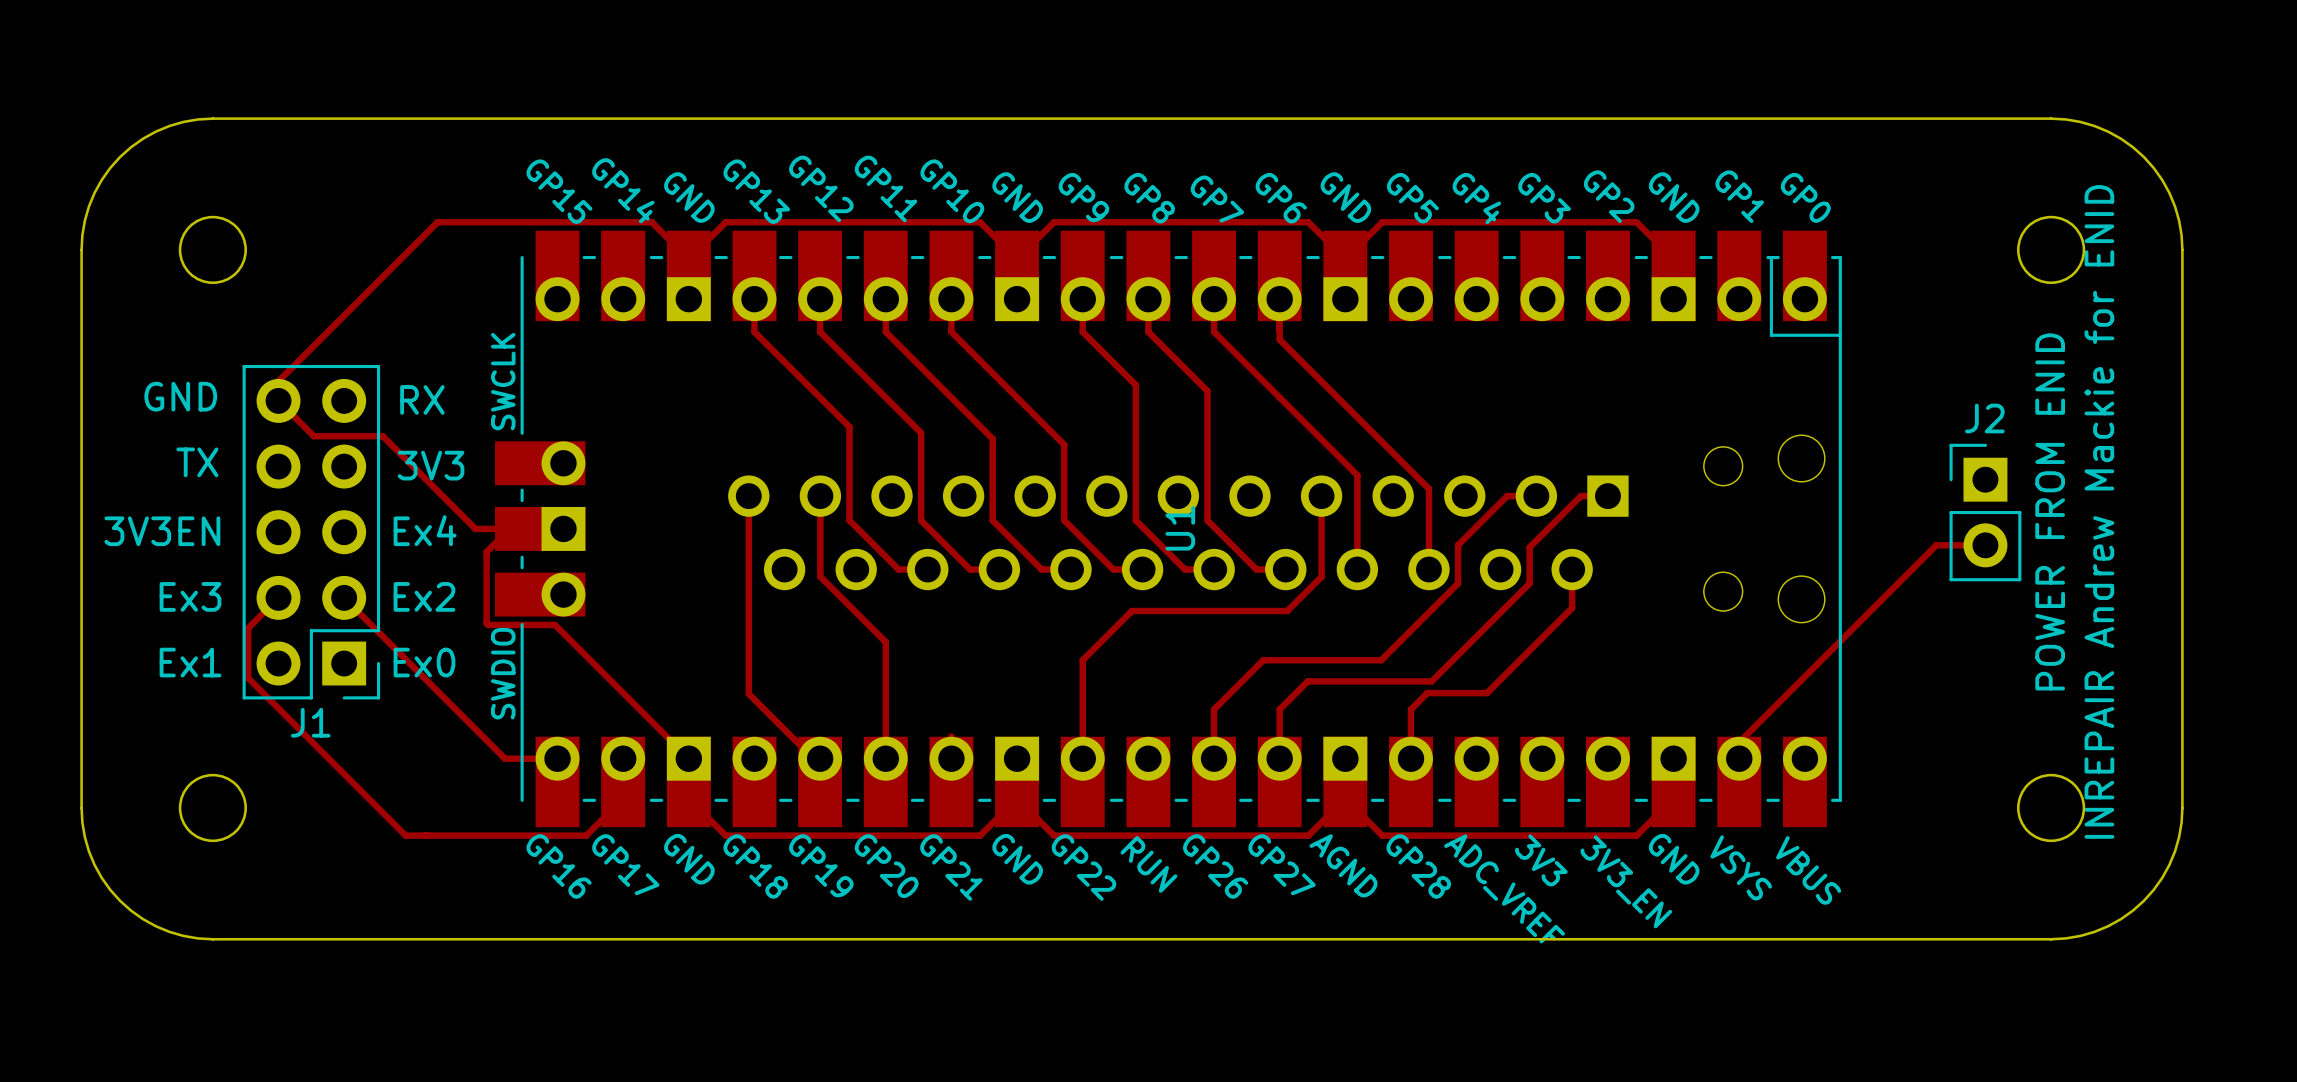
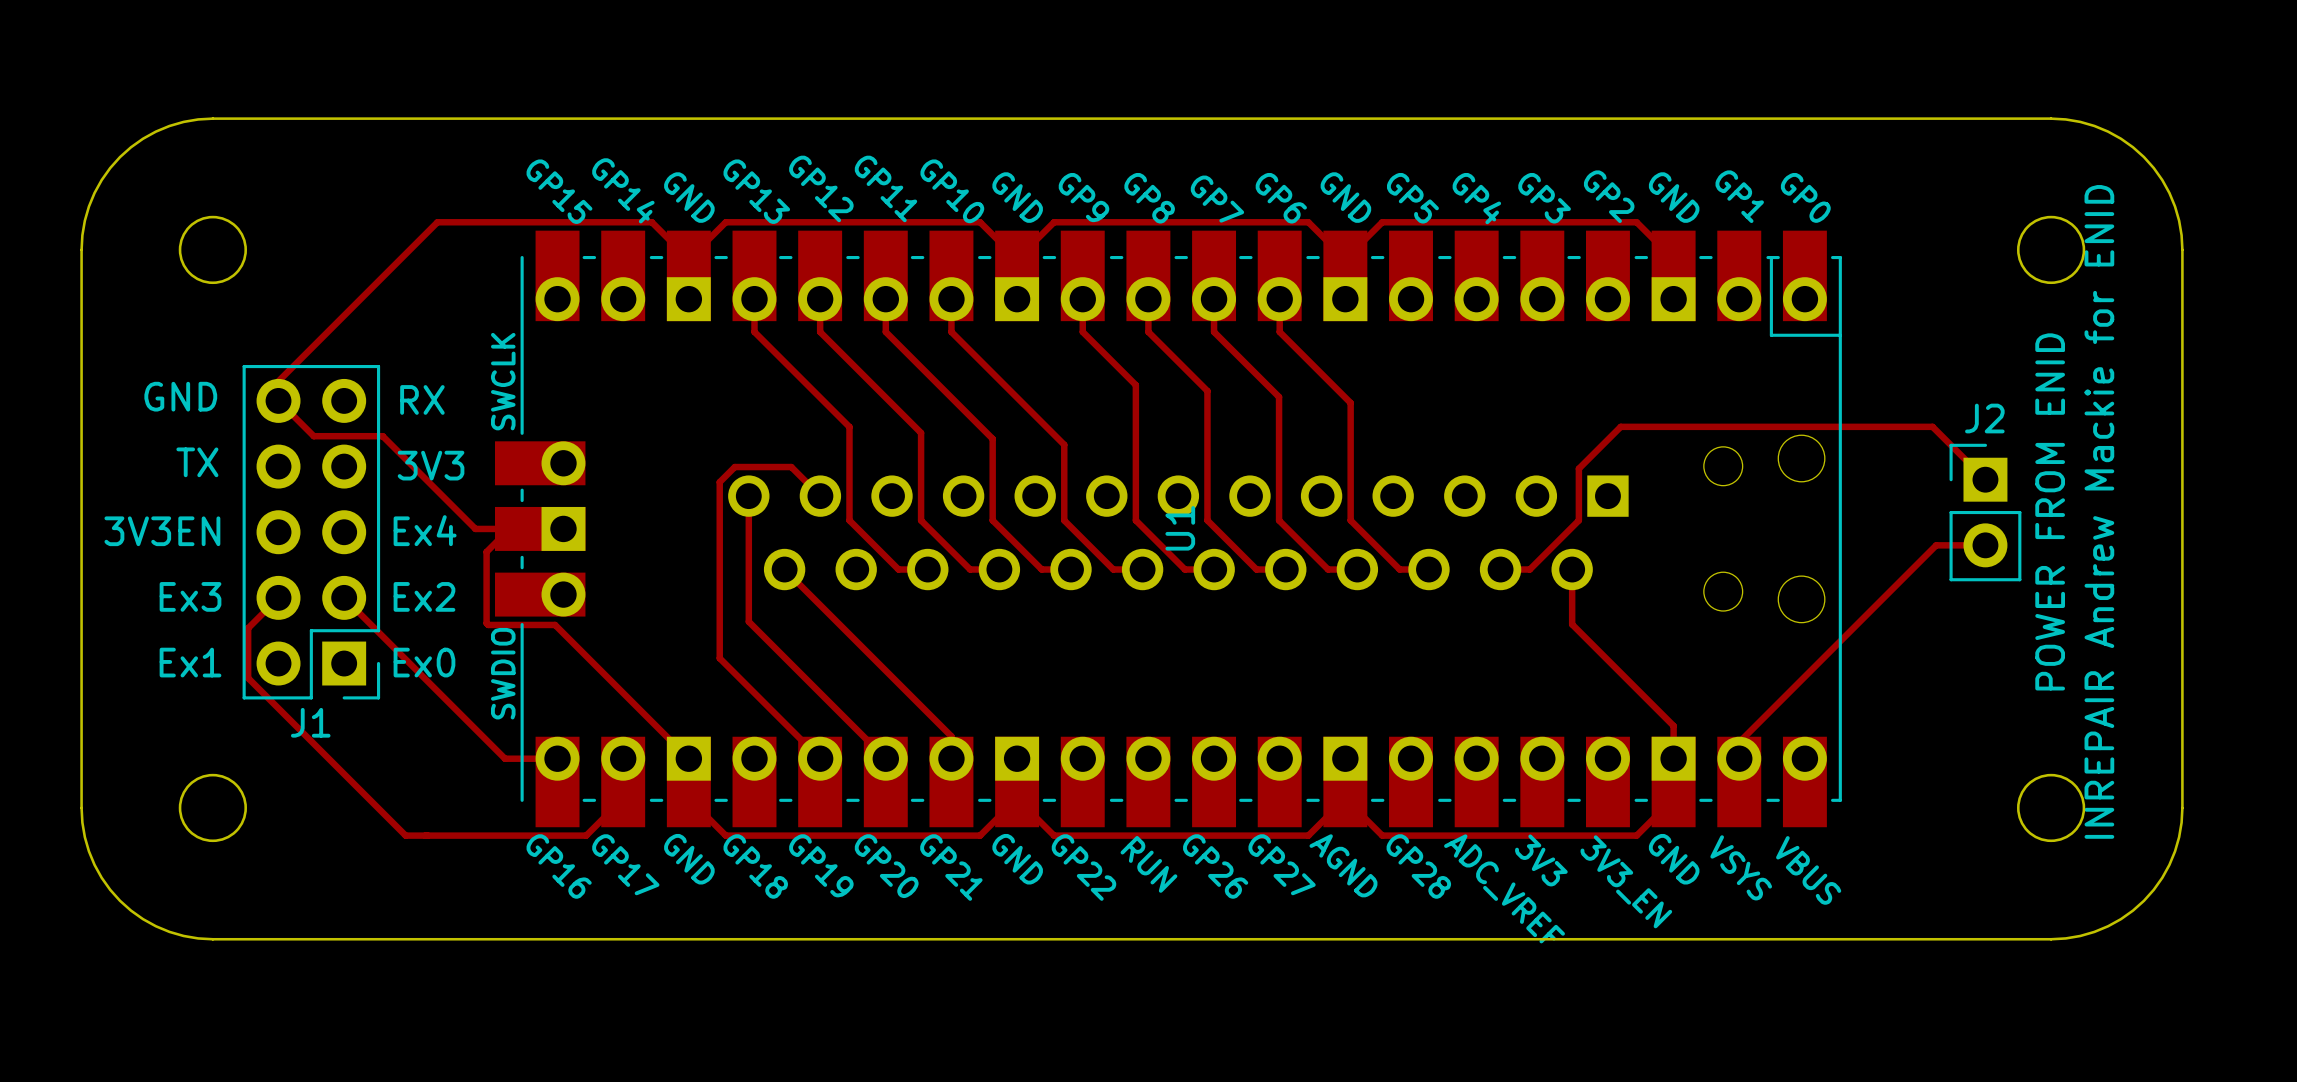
track: (1279, 331) (1279, 339) (1428, 488) (1428, 569) -> (1279, 331) (1350, 402) (1350, 520) (1399, 569) (1428, 569)
track: (1279, 397) (1357, 475) (1357, 569) -> (1279, 396) (1279, 520) (1328, 569) (1357, 569)
track: none -> (1985, 479) (1932, 426) (1620, 426) (1578, 468) (1578, 520) (1529, 569) (1500, 569)
track: (820, 496) (820, 576) (885, 642) (885, 758) -> (820, 496) (791, 467) (734, 467) (719, 482) (719, 658) (820, 758)
track: (1321, 496) (1321, 576) (1287, 611) (1131, 611) (1082, 660) (1082, 758) -> none
track: (1536, 496) (1507, 496) (1458, 545) (1458, 583) (1381, 660) (1263, 660) (1214, 709) (1214, 758) -> none
track: (1607, 496) (1580, 496) (1529, 547) (1529, 583) (1431, 681) (1307, 681) (1279, 709) (1279, 758) -> none
track: none -> (784, 569) (951, 736)
track: (1572, 608) (1487, 693) (1427, 693) (1411, 709) (1411, 758) -> (1572, 608) (1572, 624) (1673, 725) (1673, 758)
track: (748, 621) (748, 693) (813, 758) (820, 758) -> (748, 621) (885, 758)

